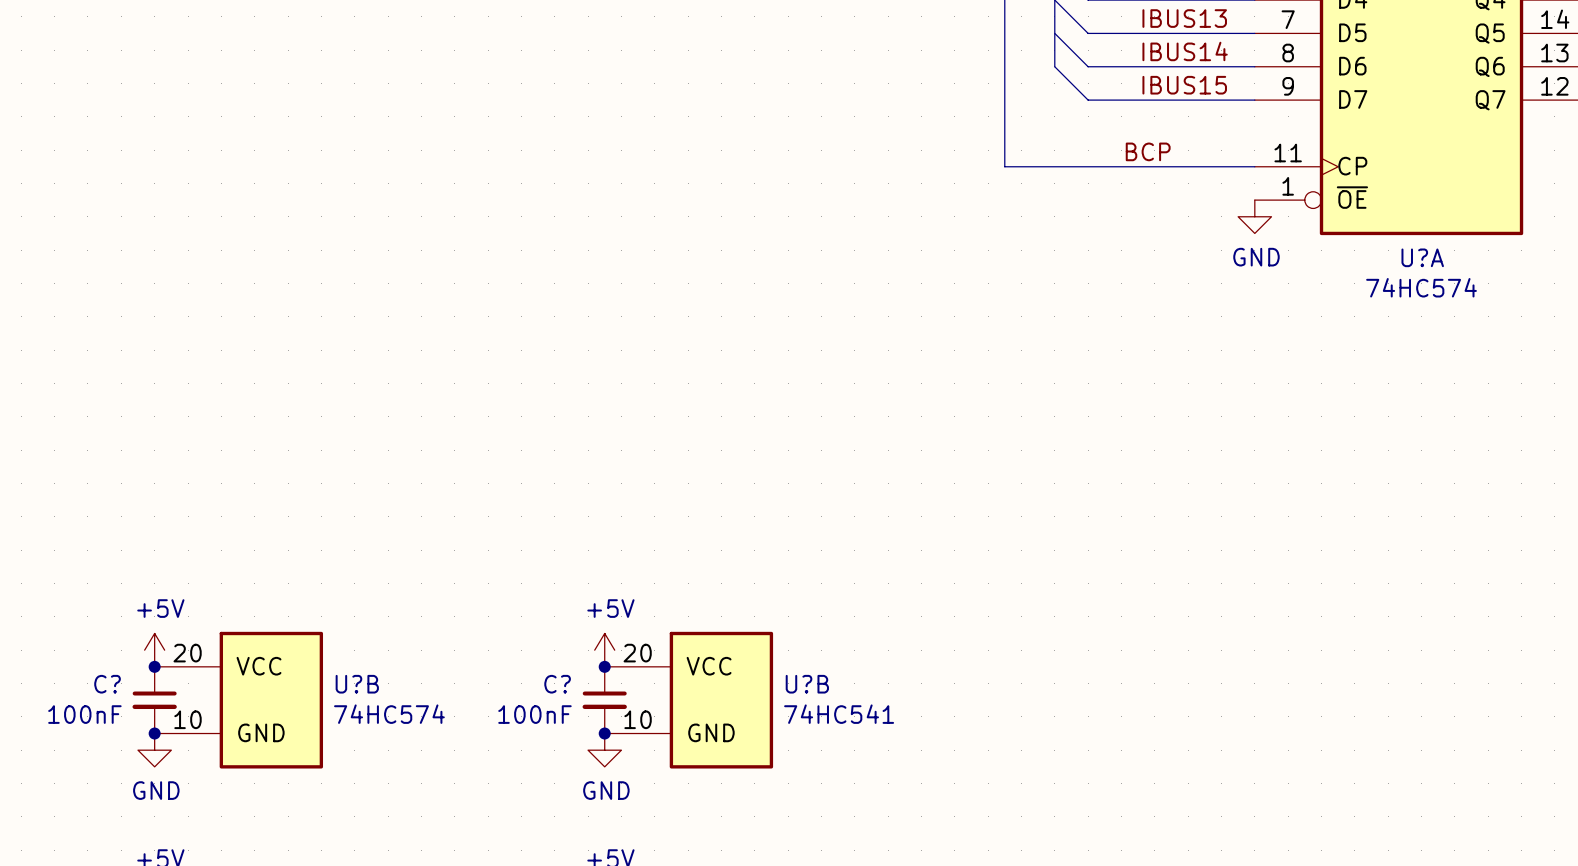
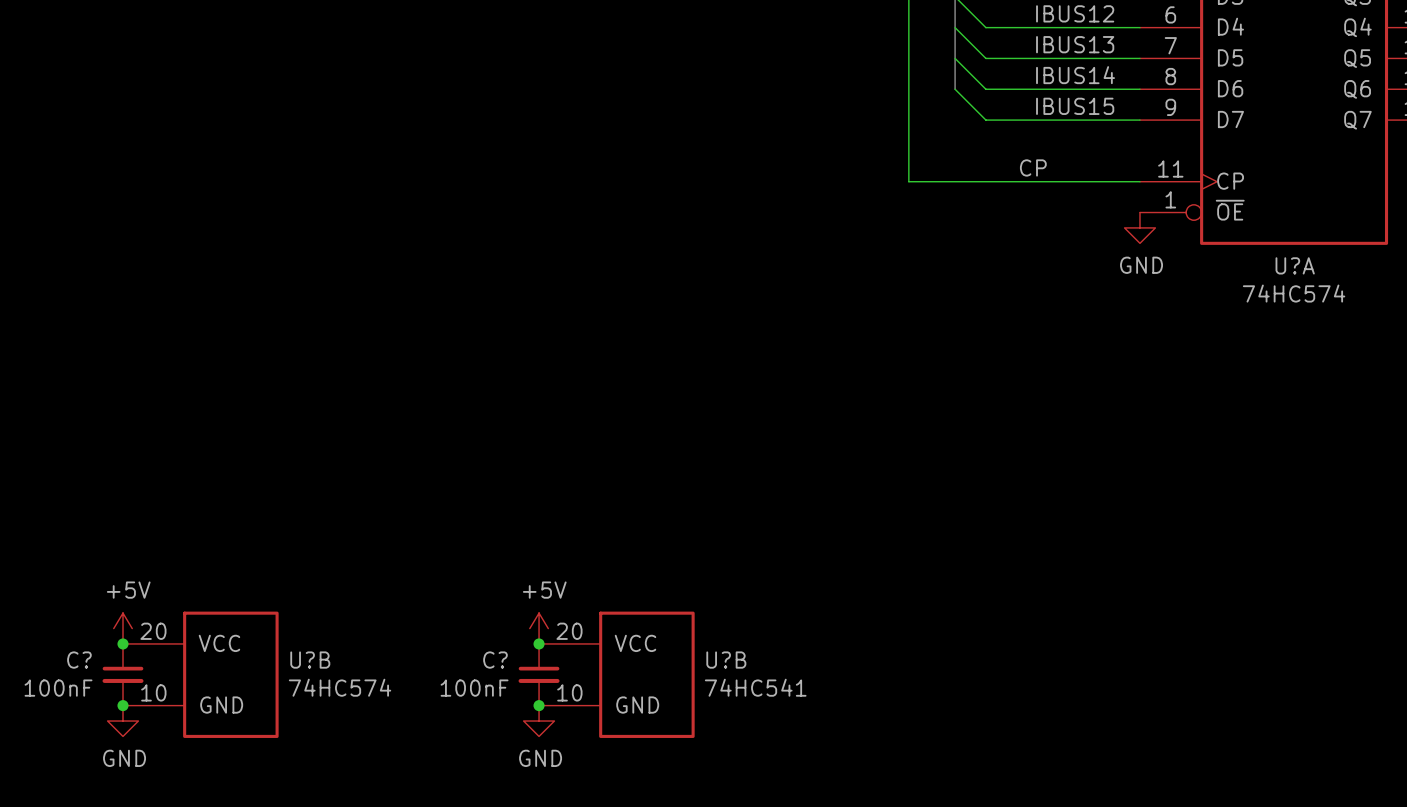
label: BCP (1148, 151) -> CP (1033, 167)

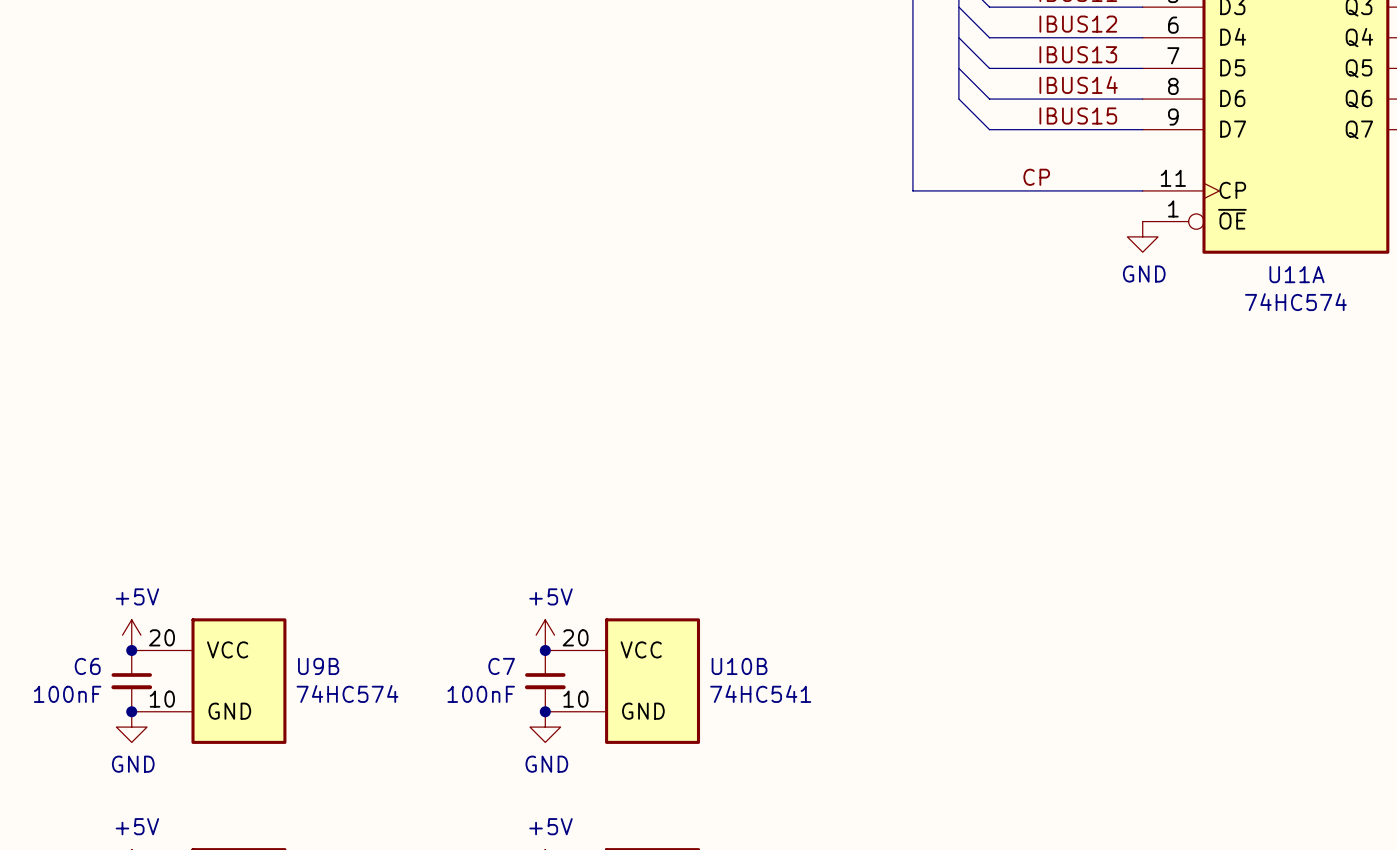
U?A name: U?A (1295, 265) -> U11A (1296, 274)
C? name: C? (79, 660) -> C6 (87, 666)
U?B name: U?B (310, 660) -> U9B (318, 666)
C? name: C? (495, 660) -> C7 (501, 666)
U?B name: U?B (726, 660) -> U10B (739, 666)

